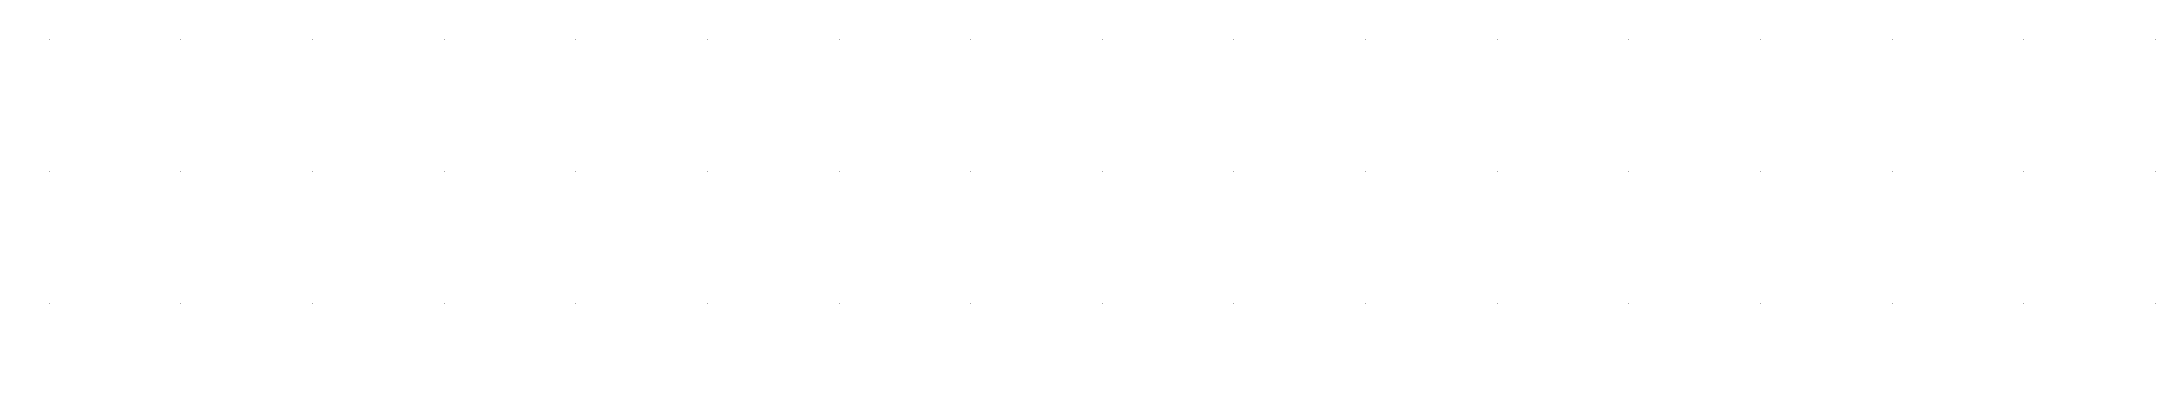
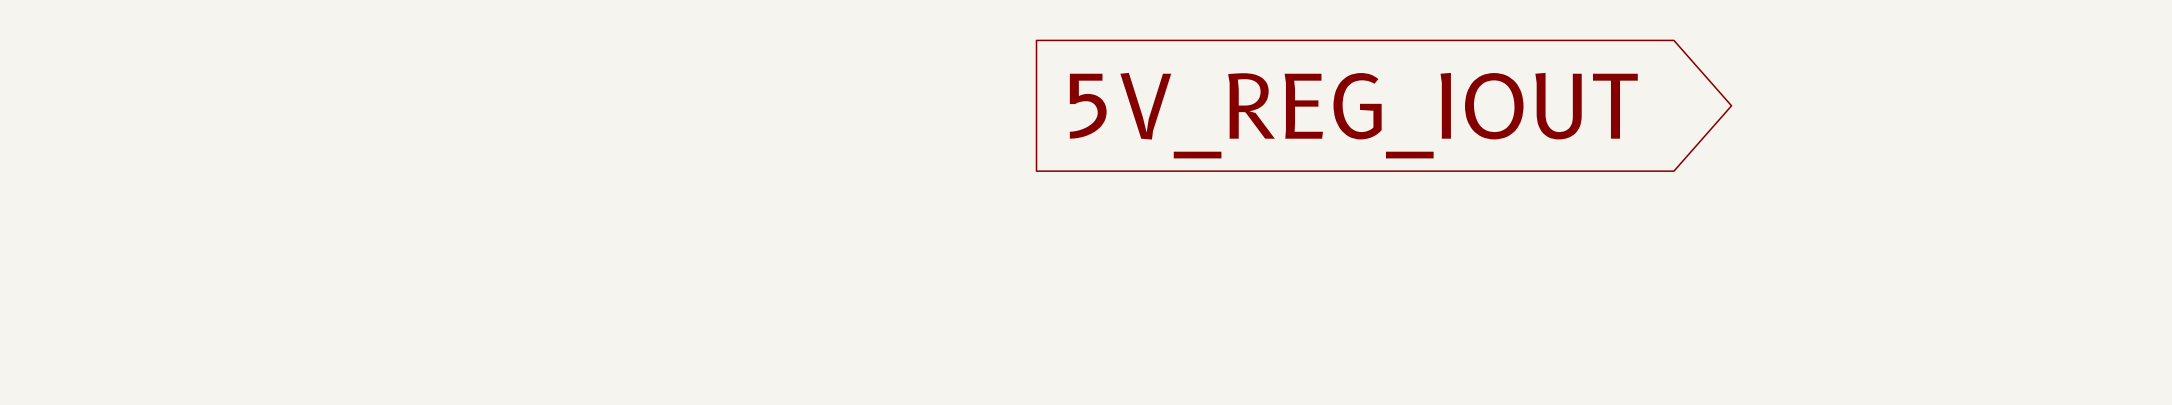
global label: none -> 5V_REG_IOUT (1353, 115)

